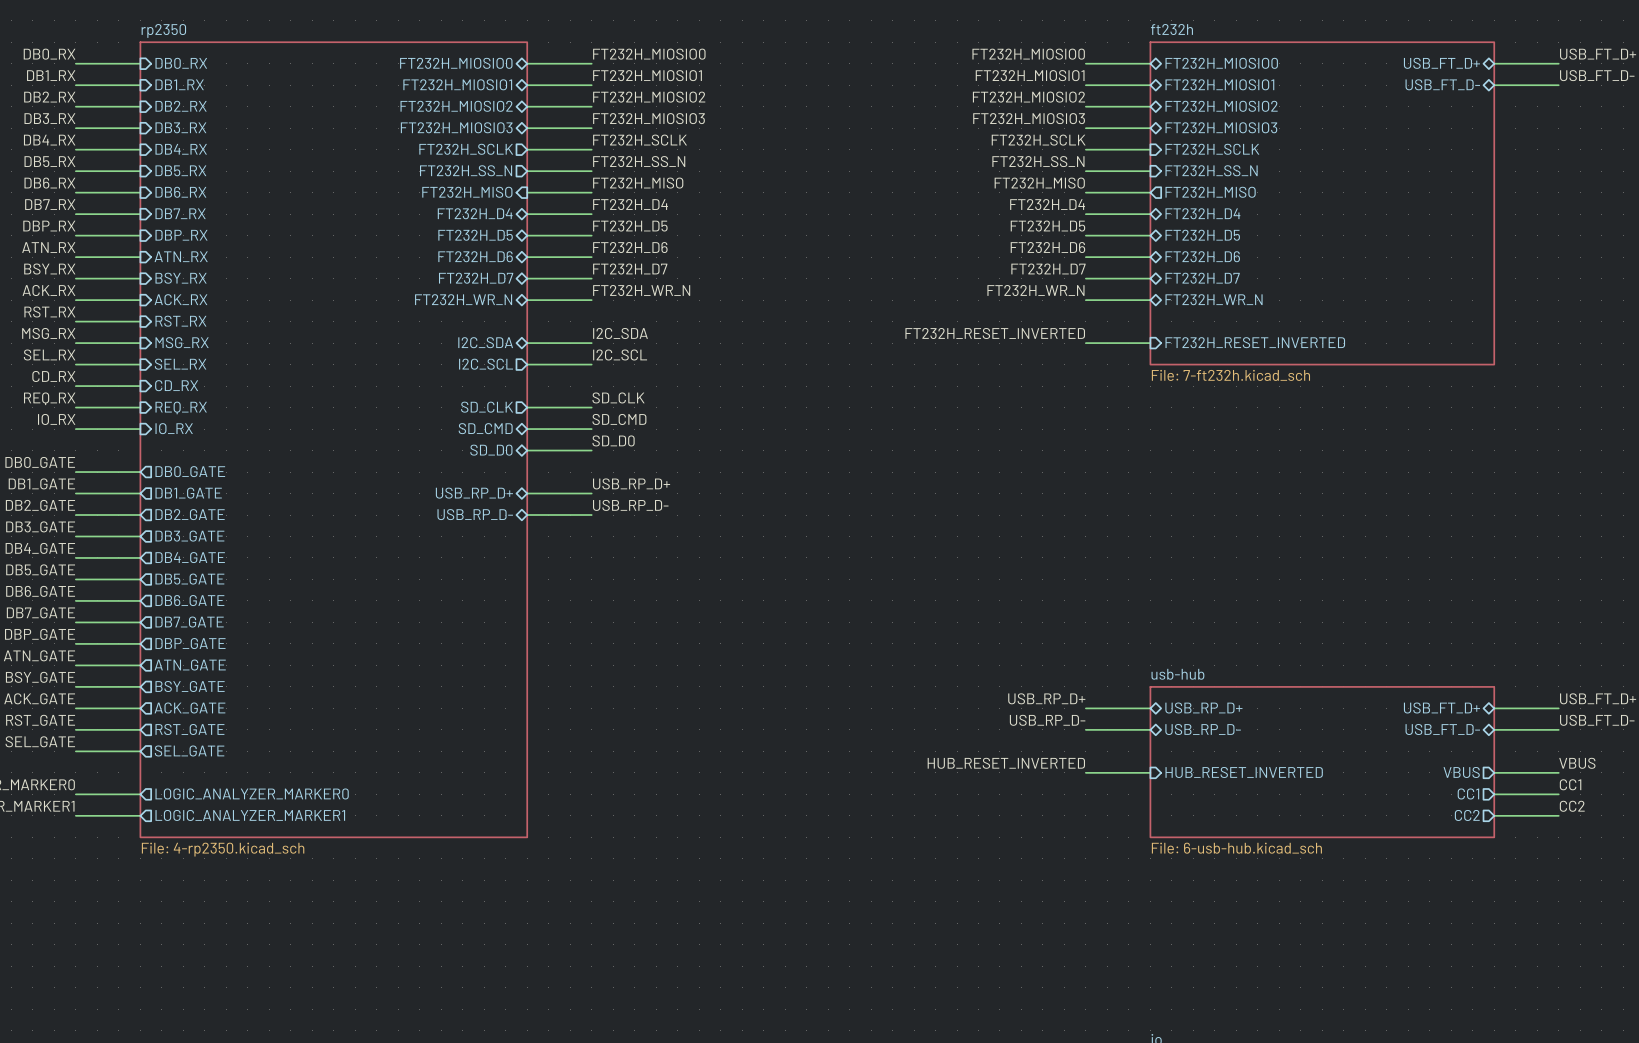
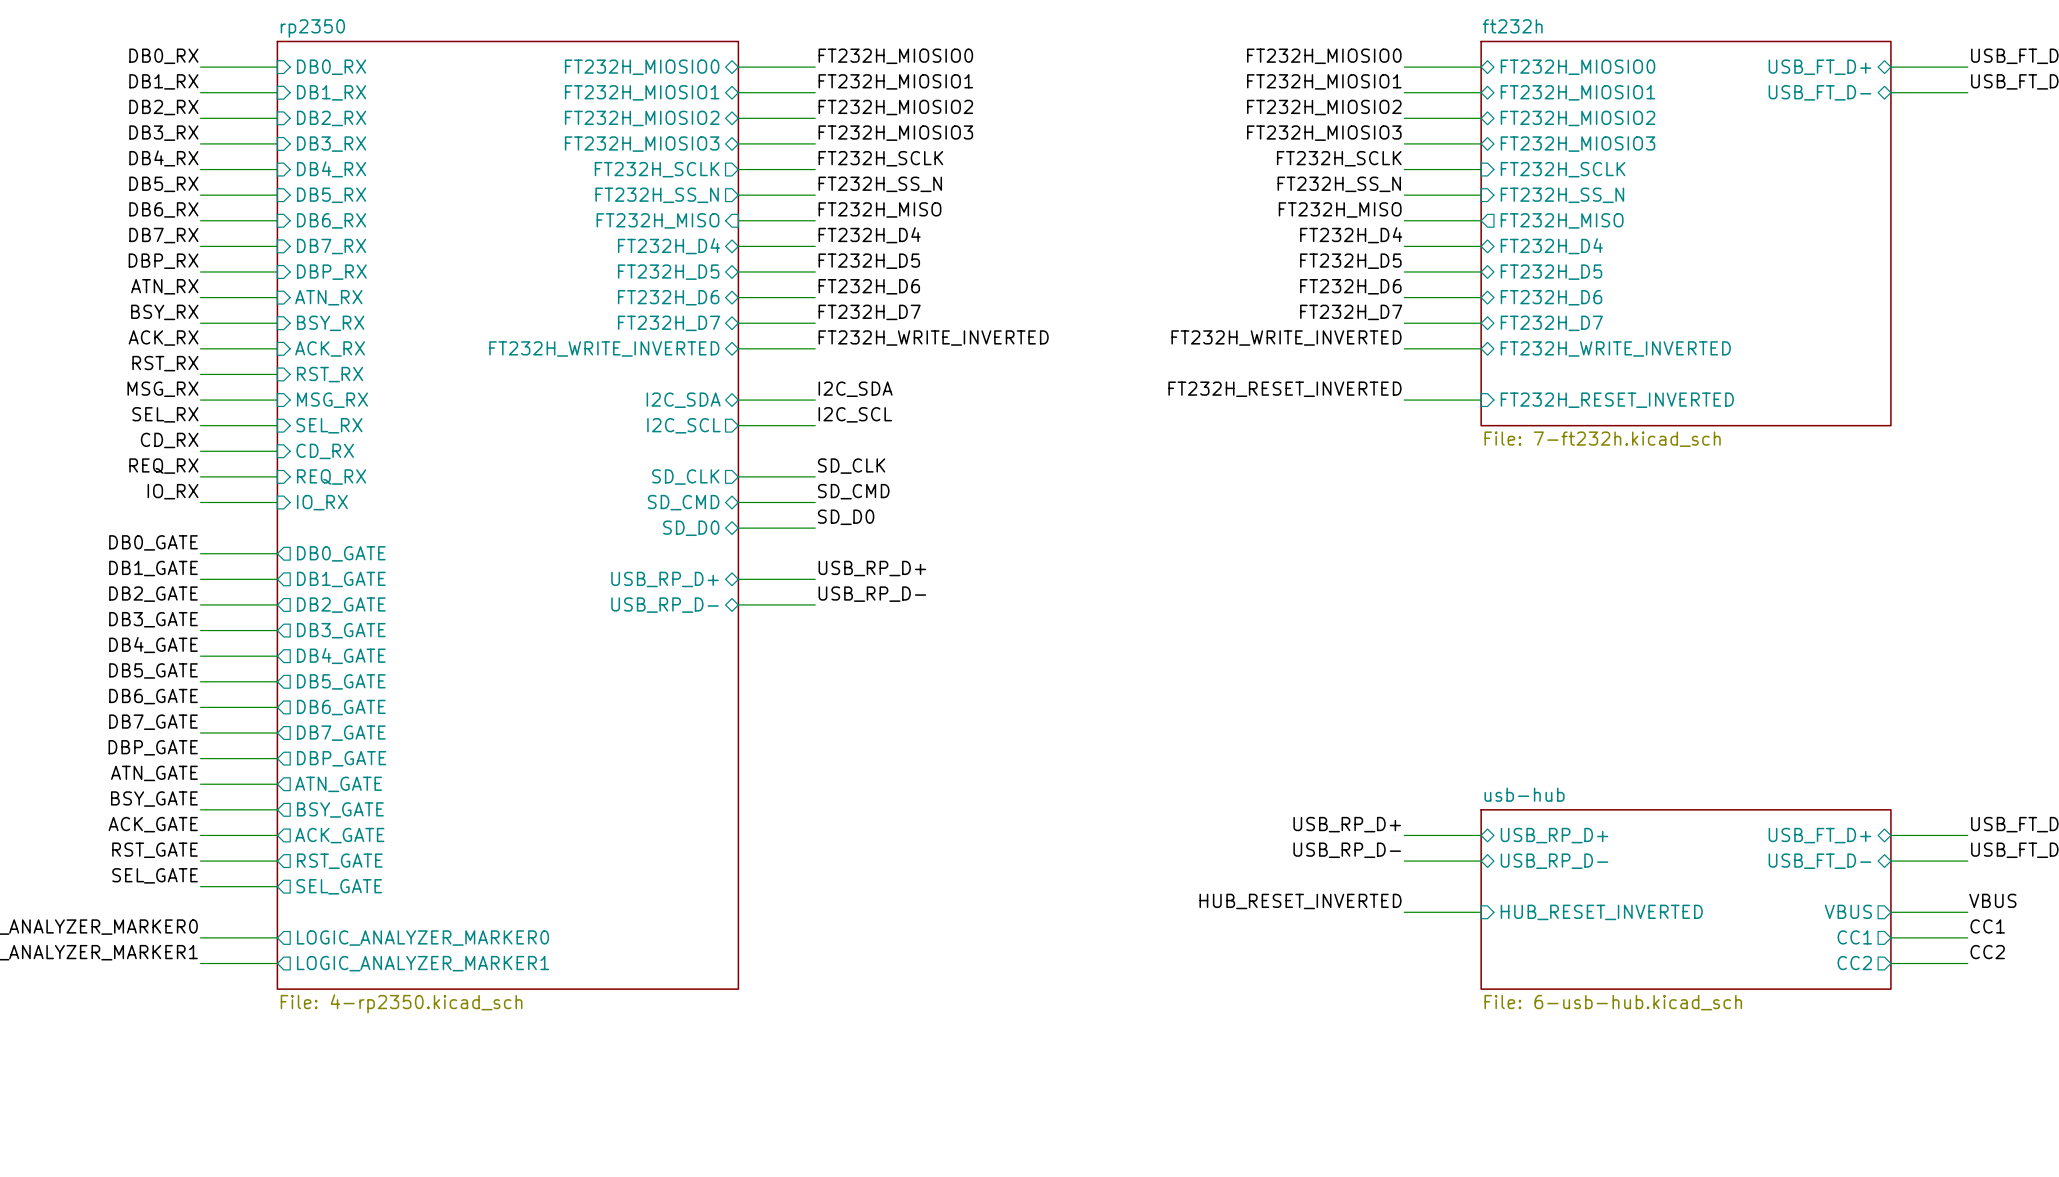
label: FT232H_WR_N (641, 290) -> FT232H_WRITE_INVERTED (933, 338)
label: FT232H_WR_N (1035, 290) -> FT232H_WRITE_INVERTED (1286, 338)
sheet pin: FT232H_WR_N (463, 299) -> FT232H_WRITE_INVERTED (604, 348)
sheet pin: FT232H_WR_N (1214, 299) -> FT232H_WRITE_INVERTED (1615, 348)

